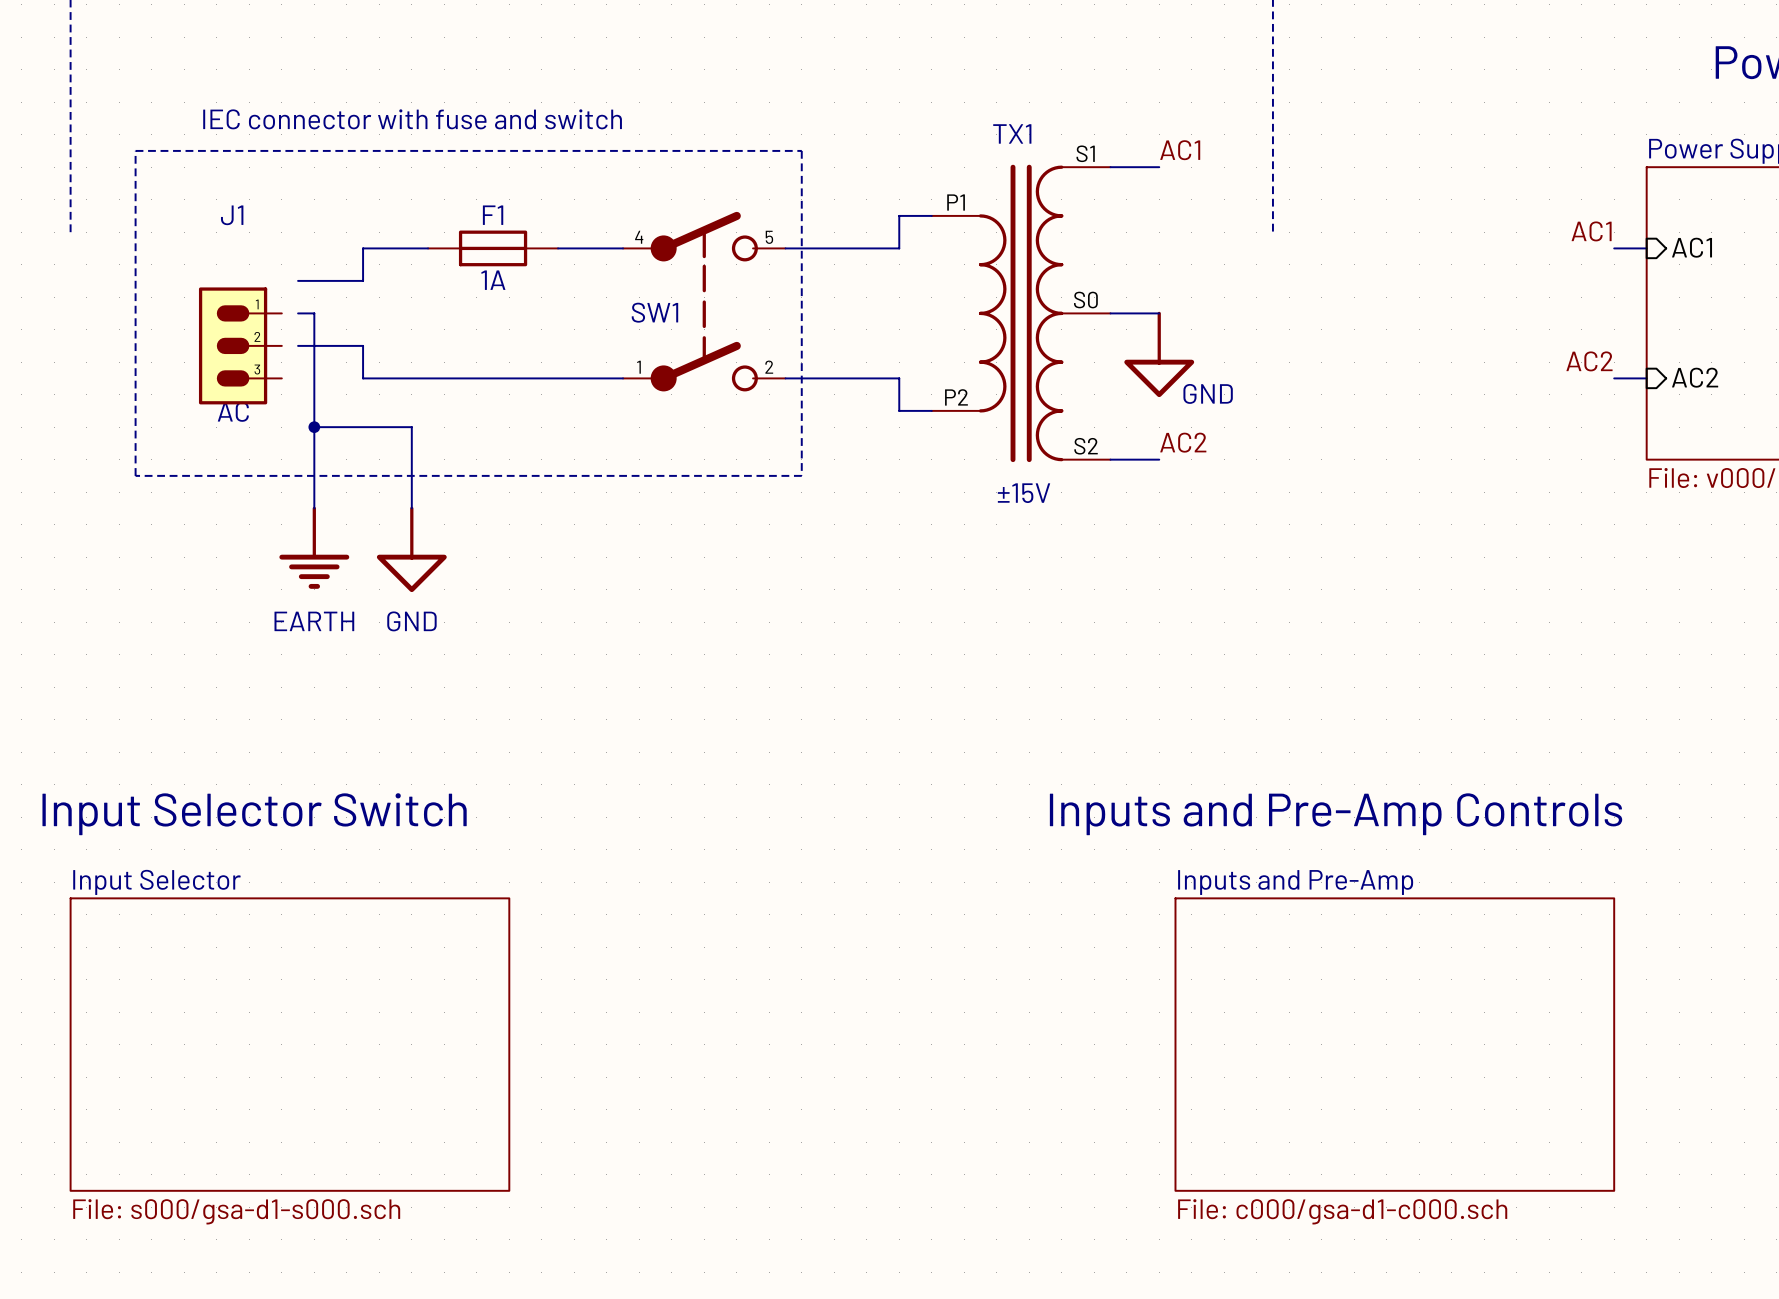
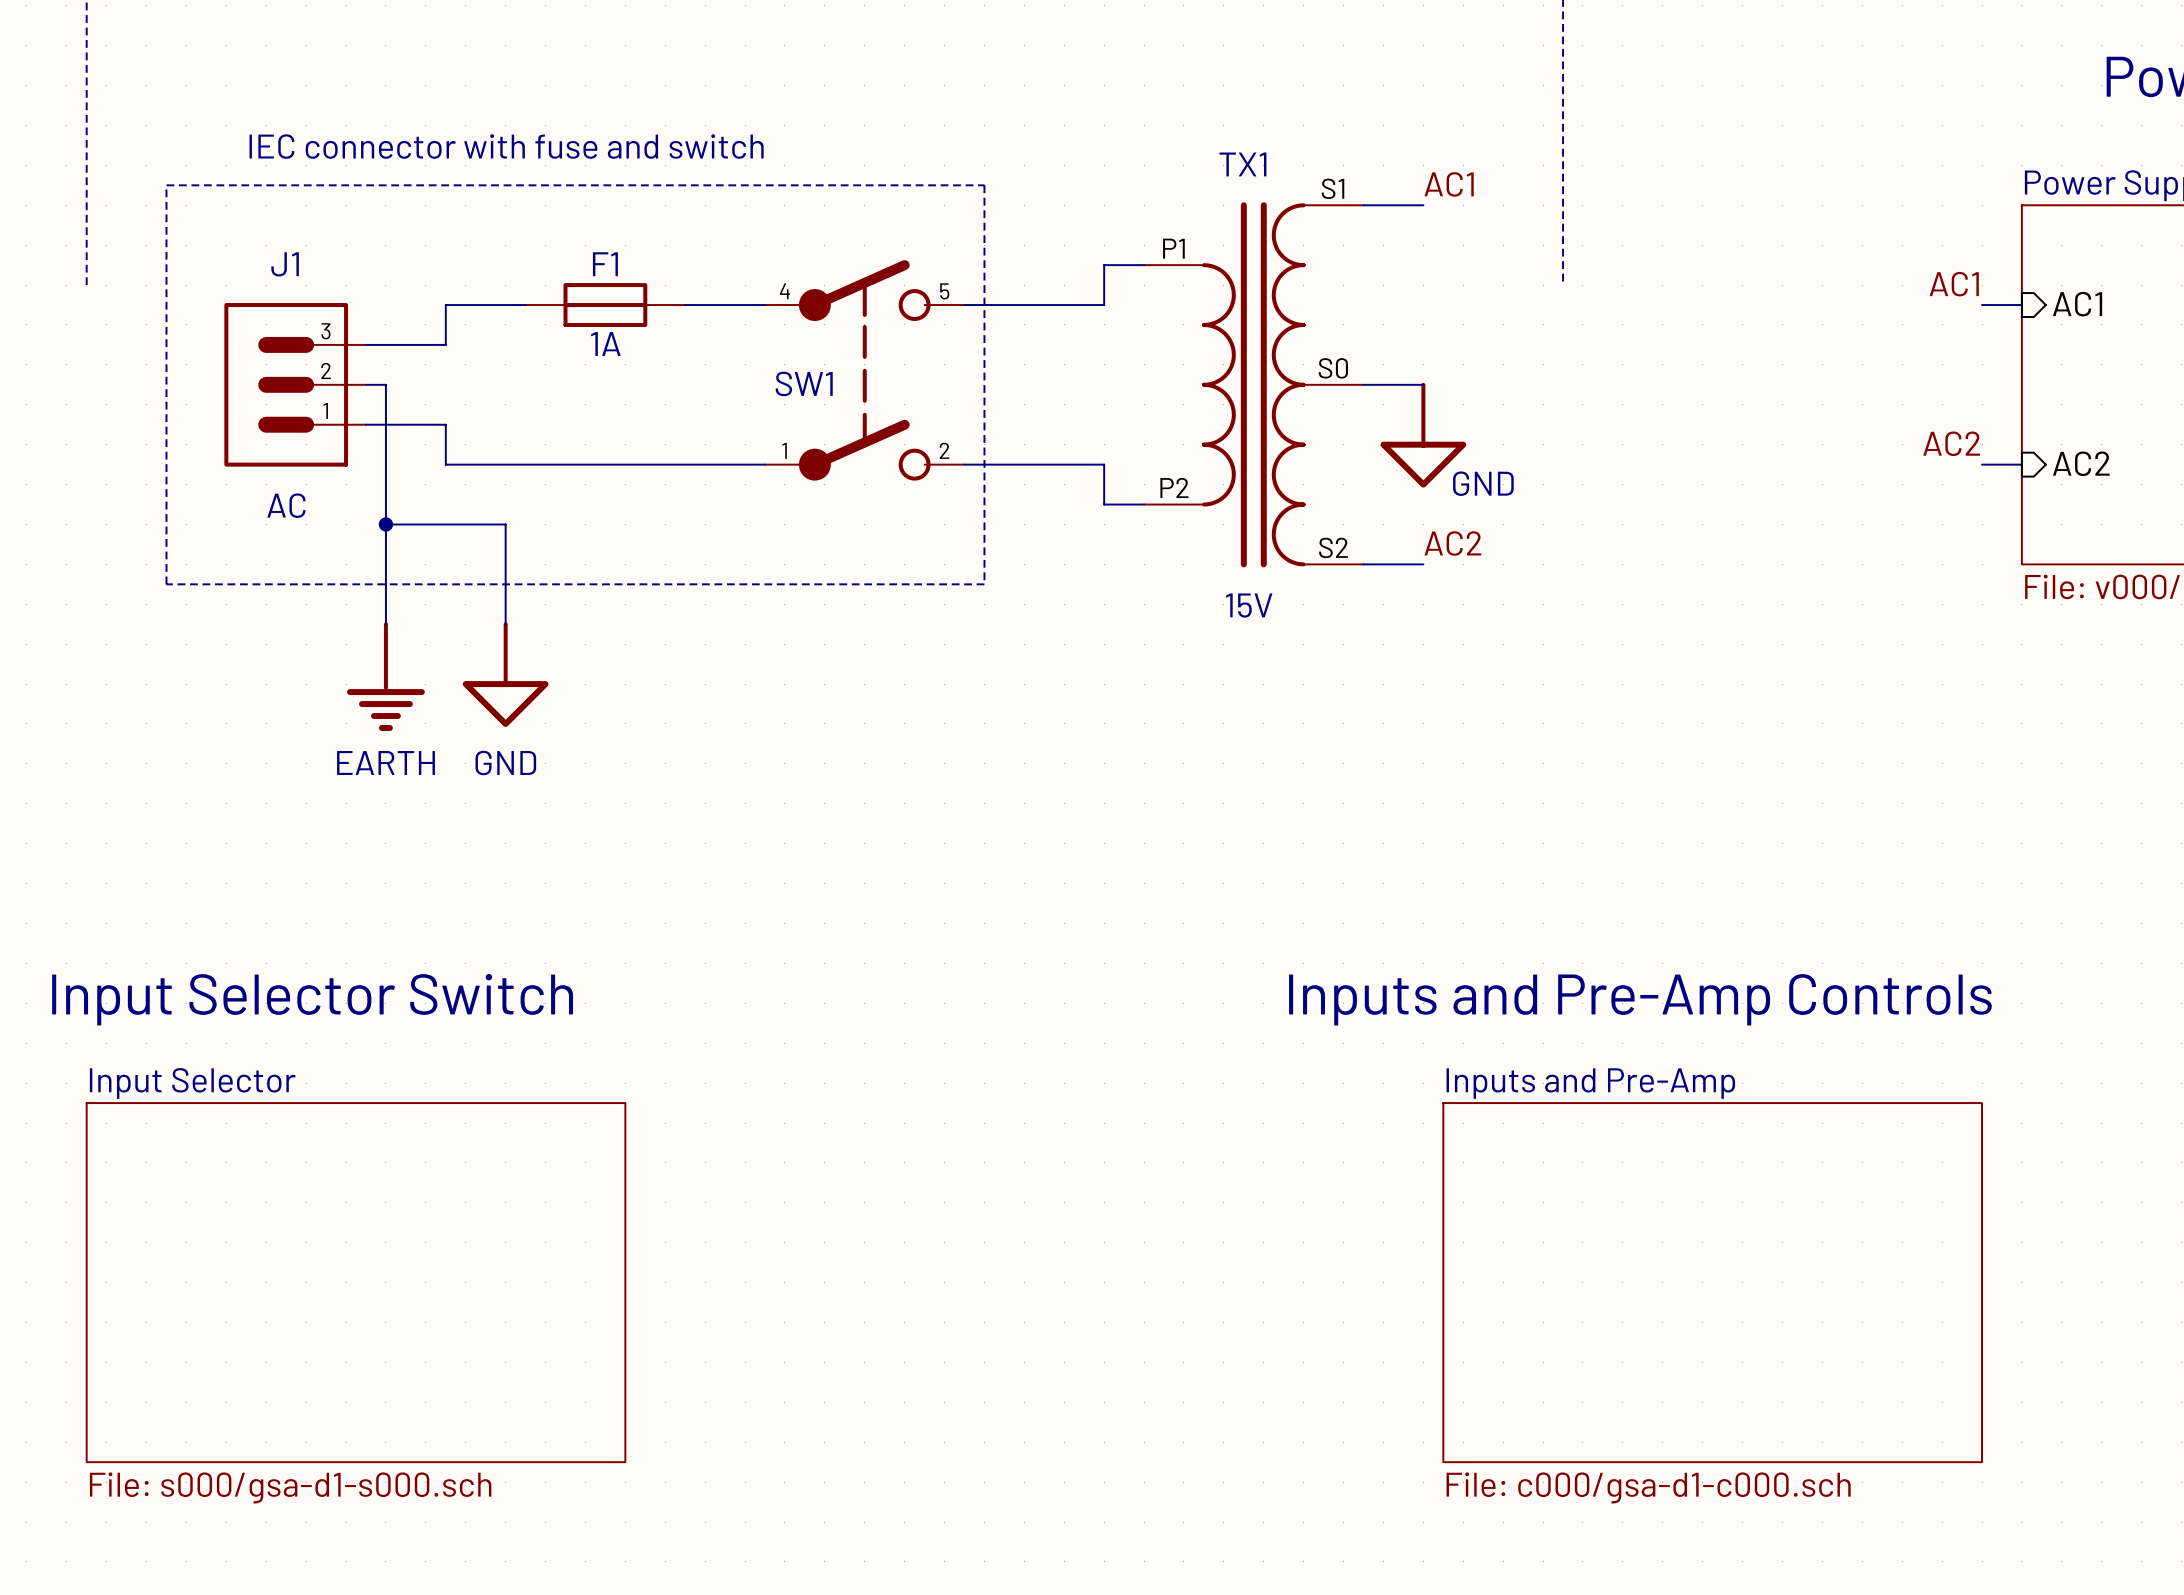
J1 symbol: [198, 287, 282, 405] -> [224, 303, 366, 467]
text: ±15V (1024, 493) -> 15V (1249, 605)
power symbol shape: [279, 506, 350, 589] -> [347, 622, 425, 731]

